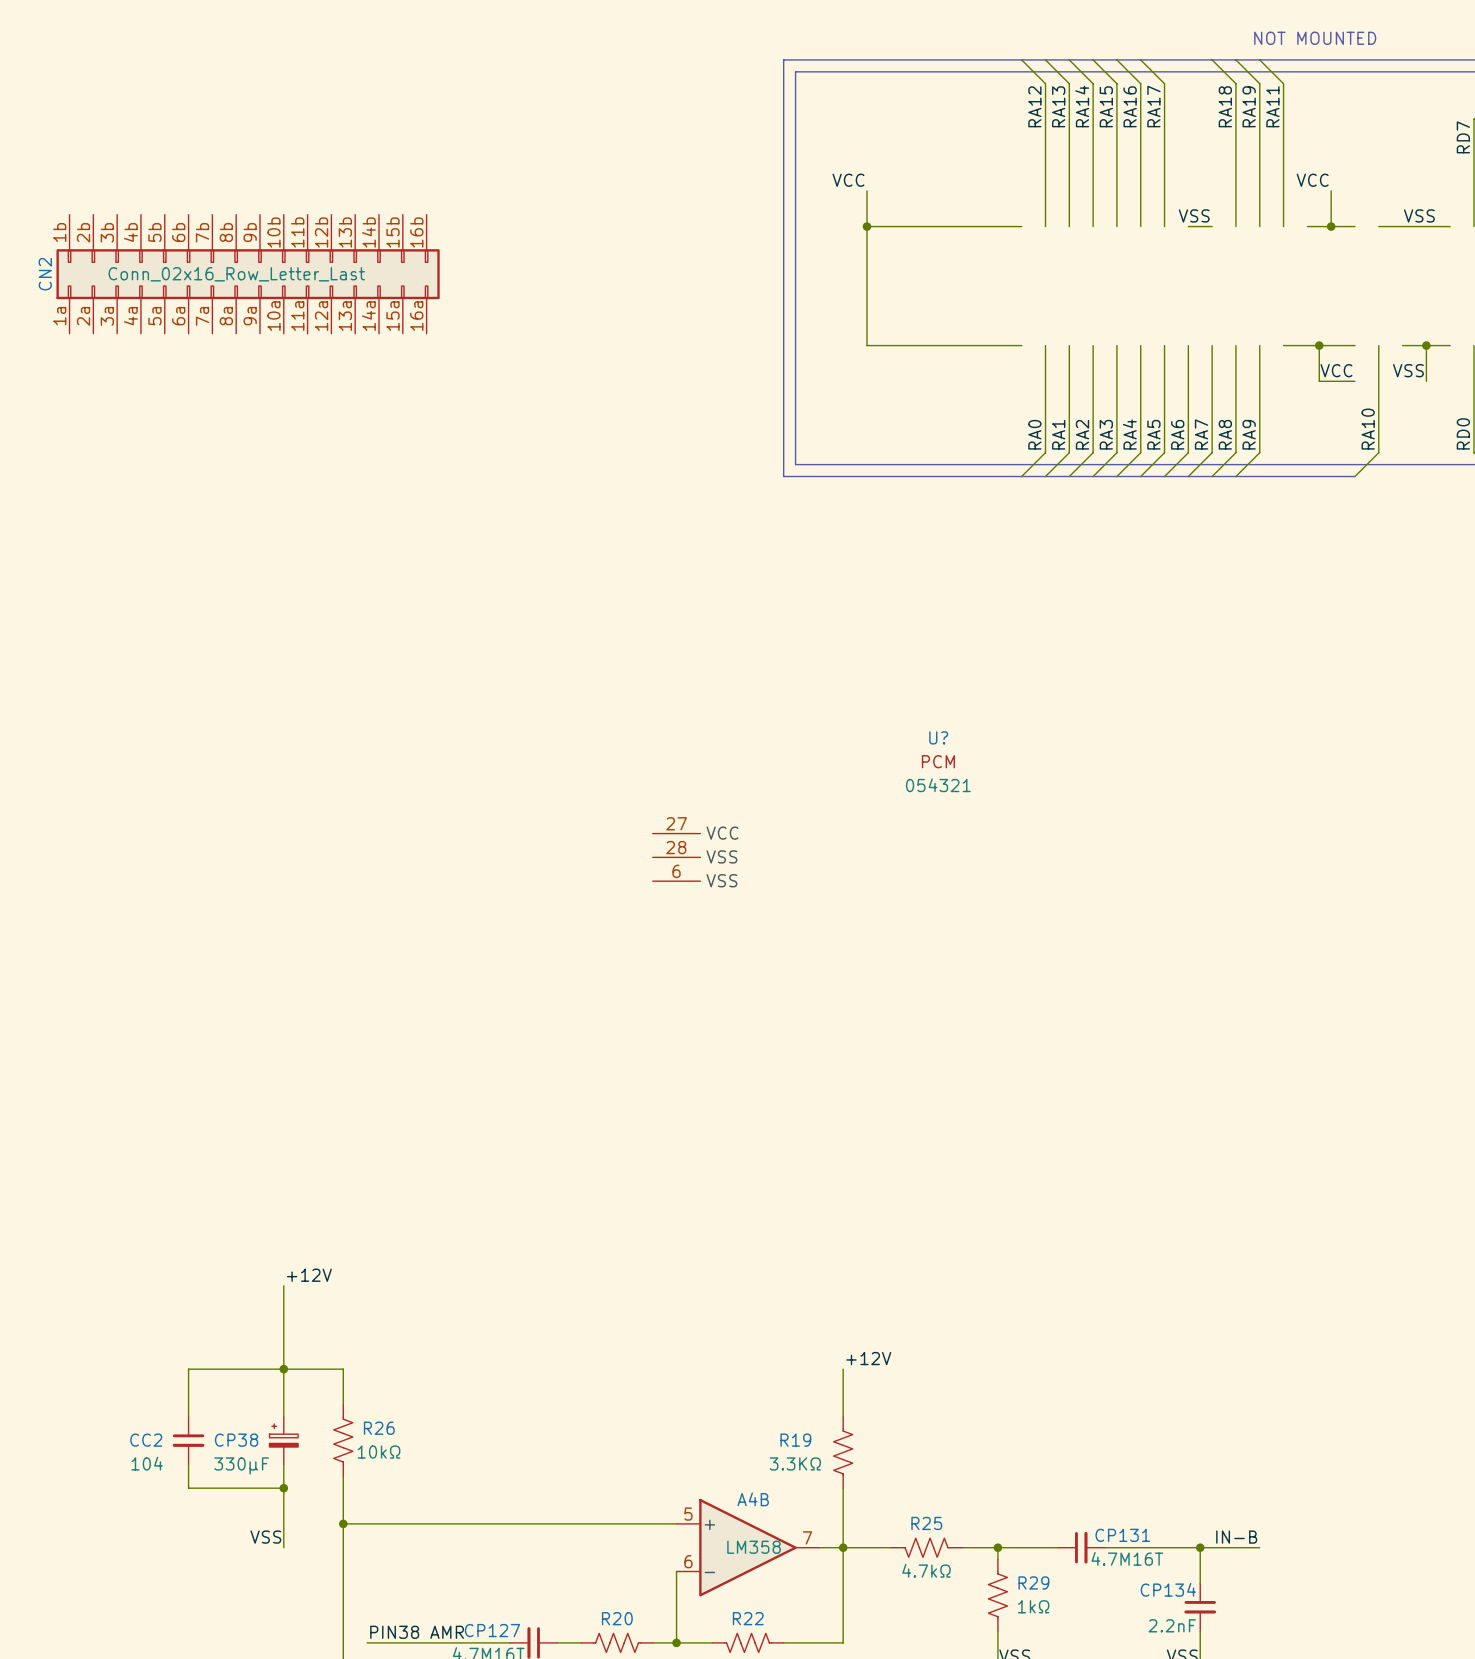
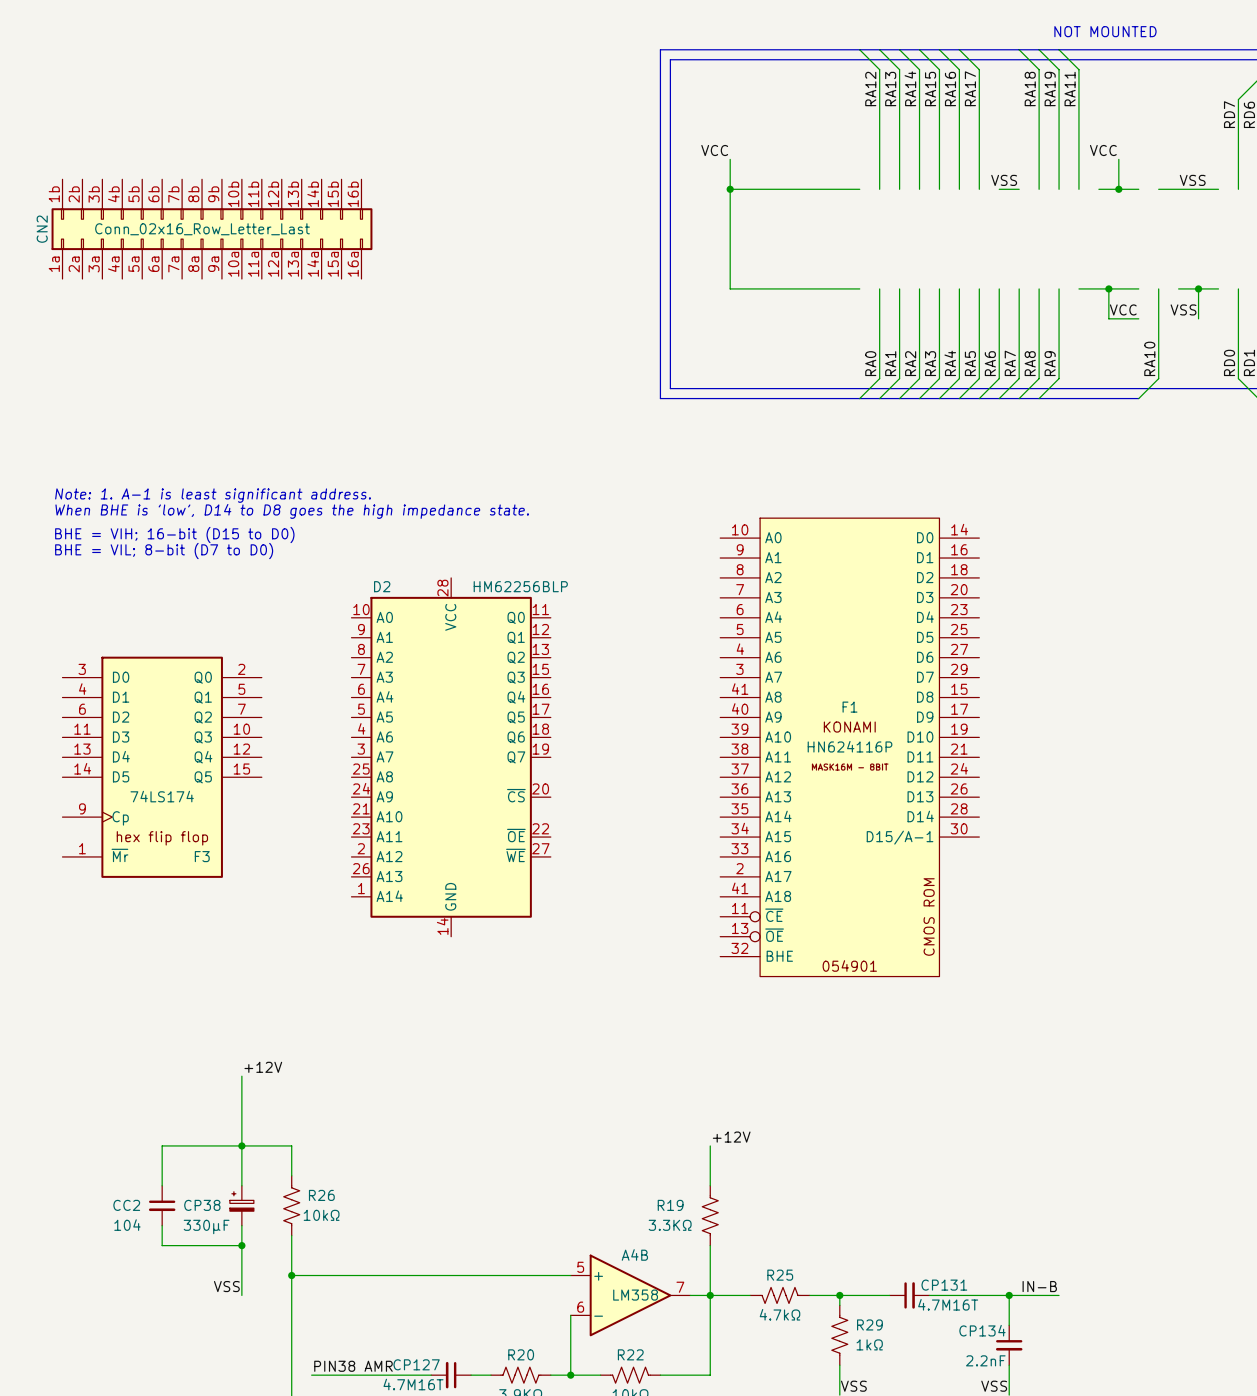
text: none -> Note: 1. A-1 is least significant address. (213, 495)
text: none -> When BHE is 'low', D14 to D8 goes the high impedance state. (292, 511)
text: none -> BHE = VIH; 16-bit (D15 to D0) (174, 534)
text: none -> BHE = VIL; 8-bit (D7 to D0) (164, 551)
U?: 054321 (676, 857) -> none
F1: none -> HN624116P (849, 747)
D2: none -> HM62256BLP (451, 757)
F3: none -> 74LS174 (162, 767)

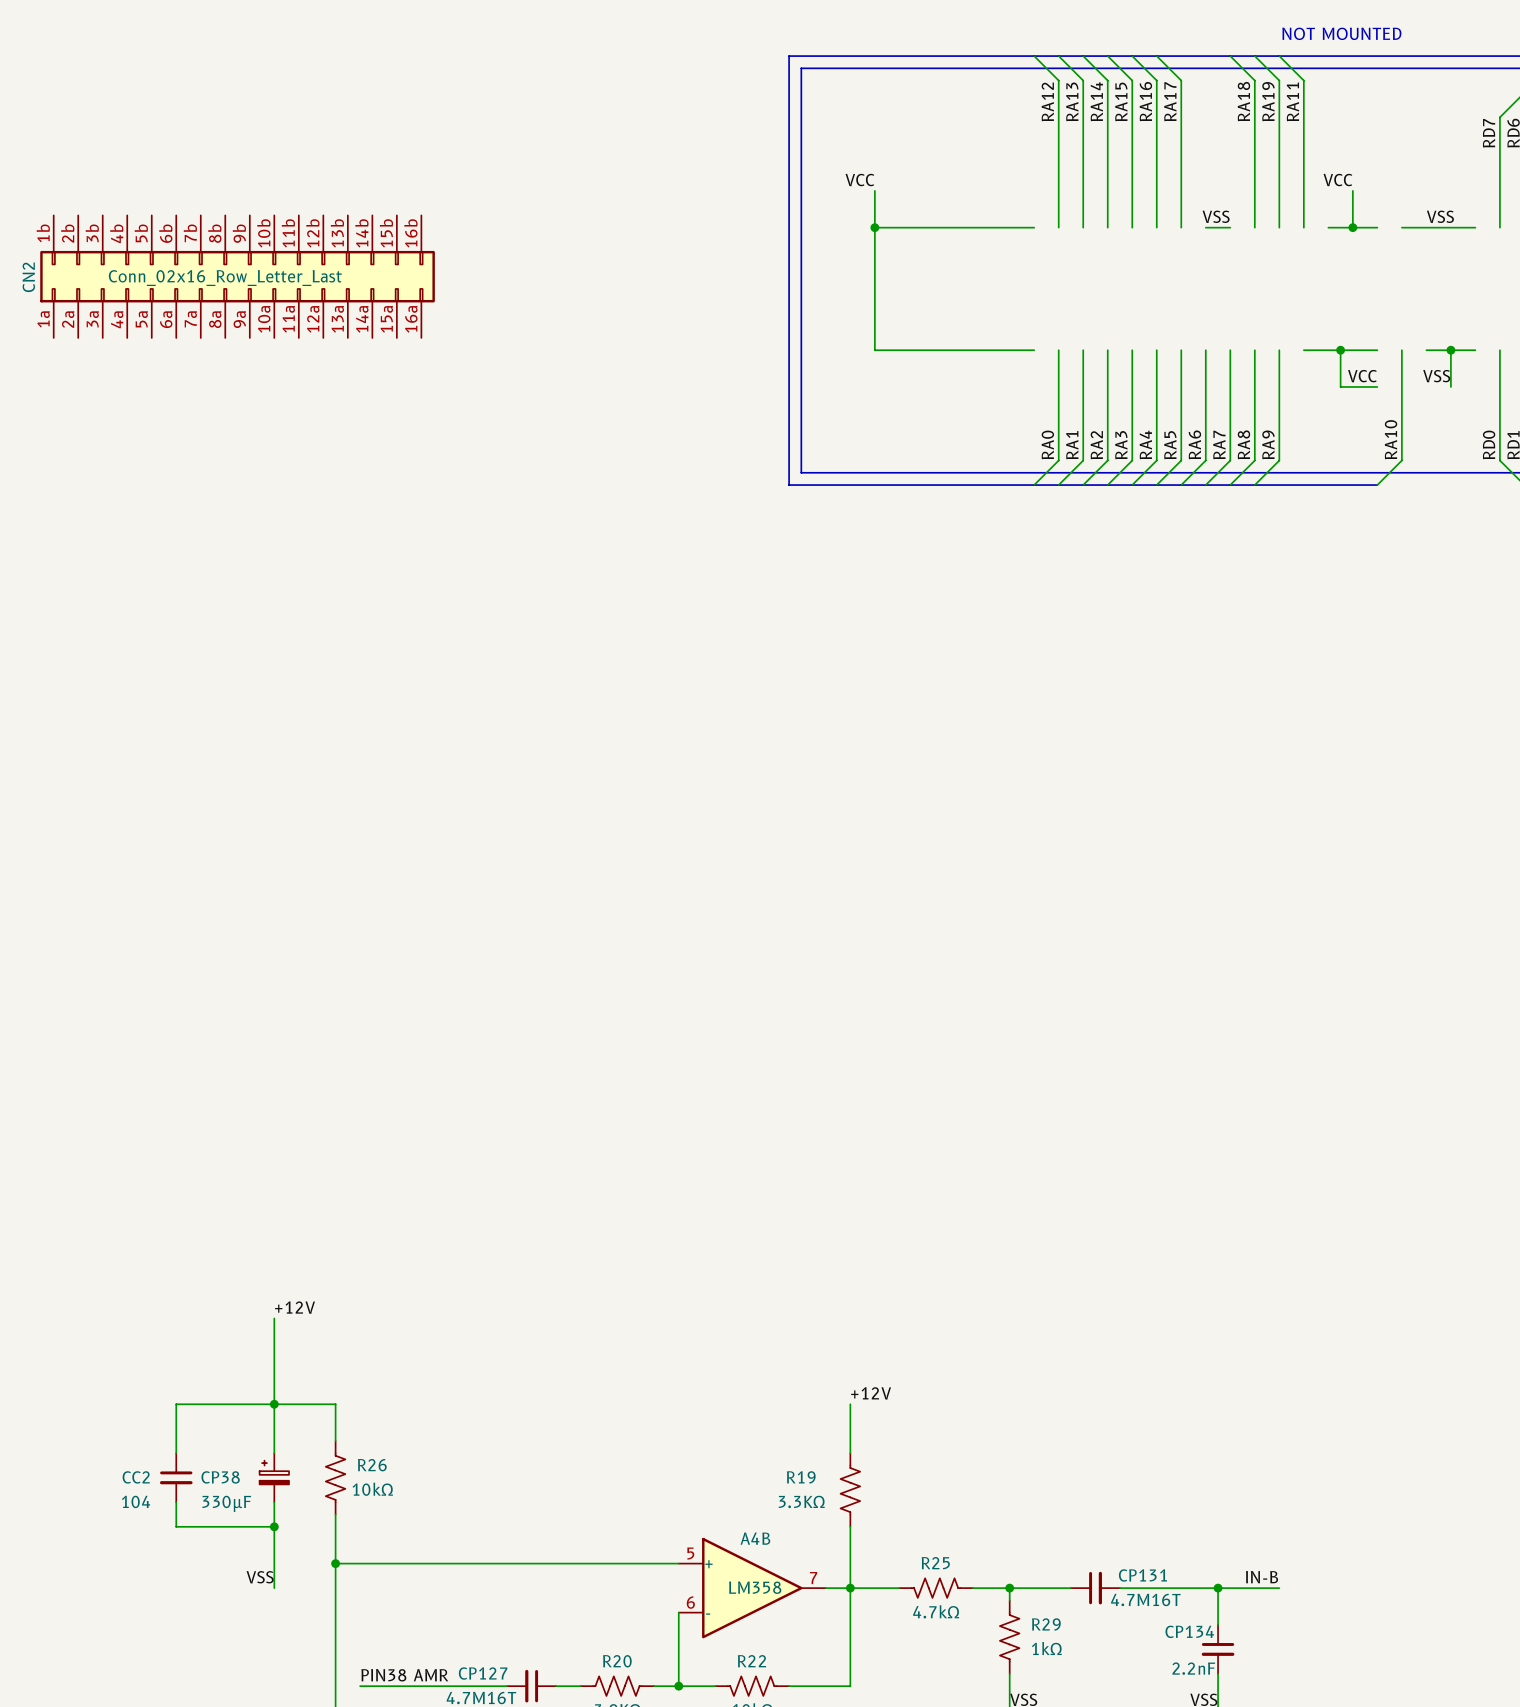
text: Note: 1. A-1 is least significant address. (213, 495) -> none
text: When BHE is 'low', D14 to D8 goes the high impedance state. (292, 511) -> none
text: BHE = VIH; 16-bit (D15 to D0) (174, 534) -> none
text: BHE = VIL; 8-bit (D7 to D0) (164, 551) -> none
F1: HN624116P (849, 747) -> none
D2: HM62256BLP (451, 757) -> none
F3: 74LS174 (162, 767) -> none

